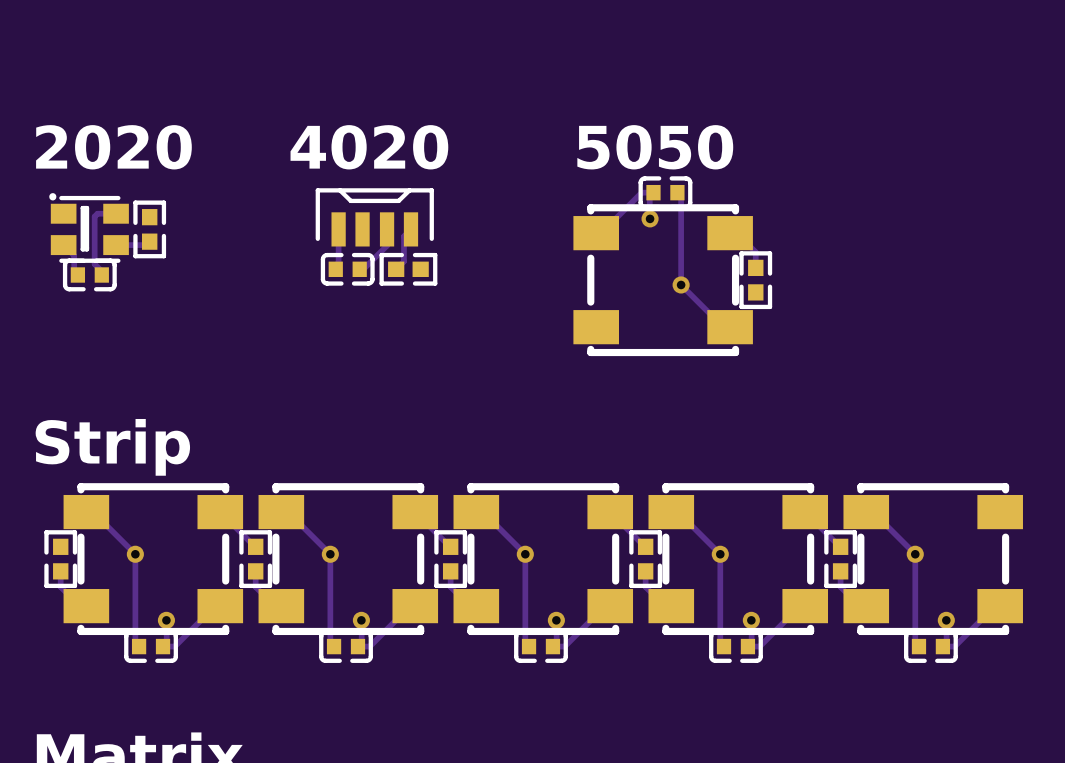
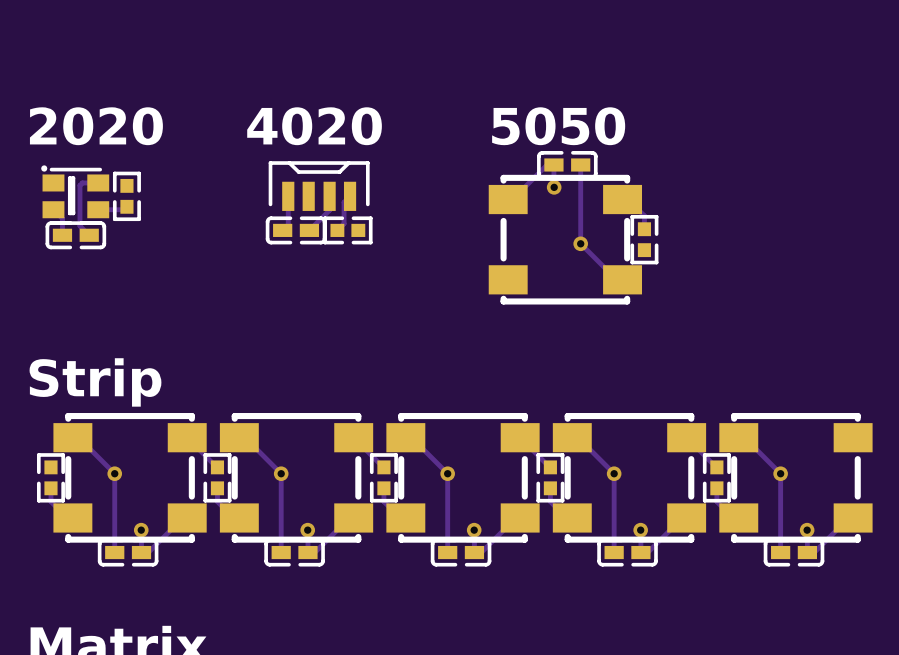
part footprint: [638, 176, 693, 210] -> [537, 150, 598, 179]
part footprint: [320, 252, 375, 286] -> [265, 216, 327, 245]
part footprint: [62, 258, 117, 292] -> [45, 221, 107, 250]
part footprint: [124, 630, 178, 663] -> [97, 538, 159, 567]
part footprint: [319, 630, 373, 663] -> [264, 538, 325, 567]
part footprint: [514, 630, 568, 663] -> [430, 538, 492, 567]
part footprint: [709, 630, 763, 663] -> [597, 538, 658, 567]
part footprint: [904, 630, 958, 663] -> [763, 538, 825, 567]

